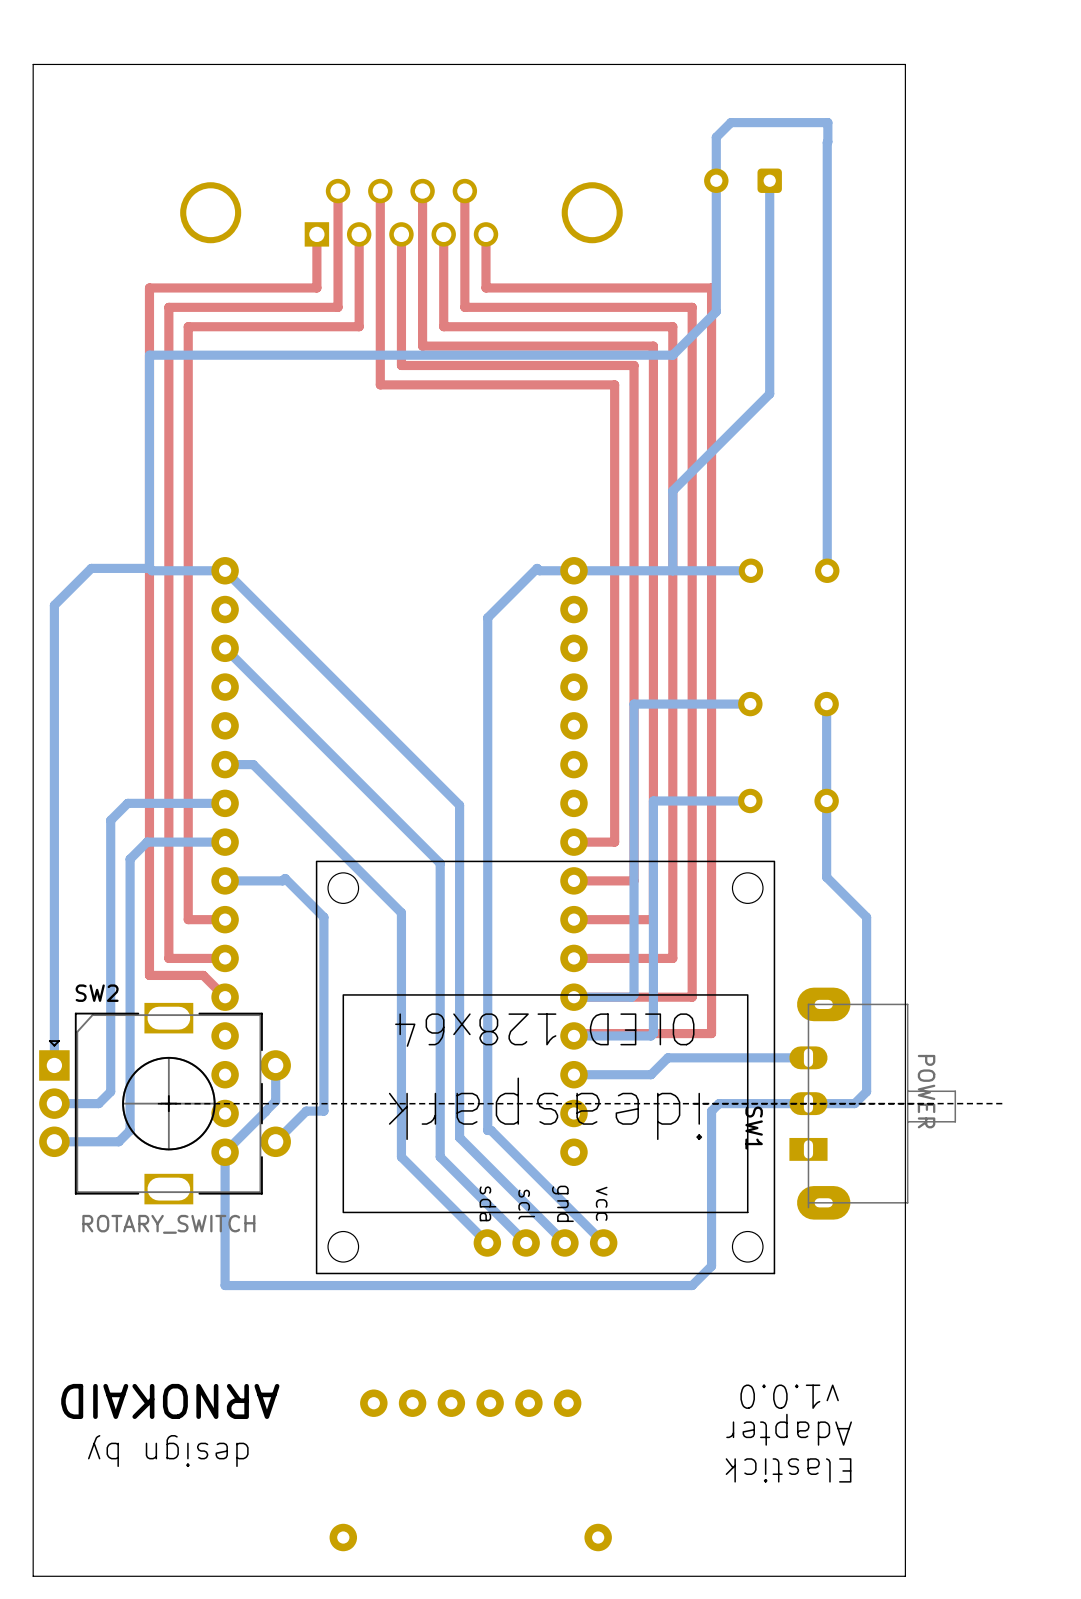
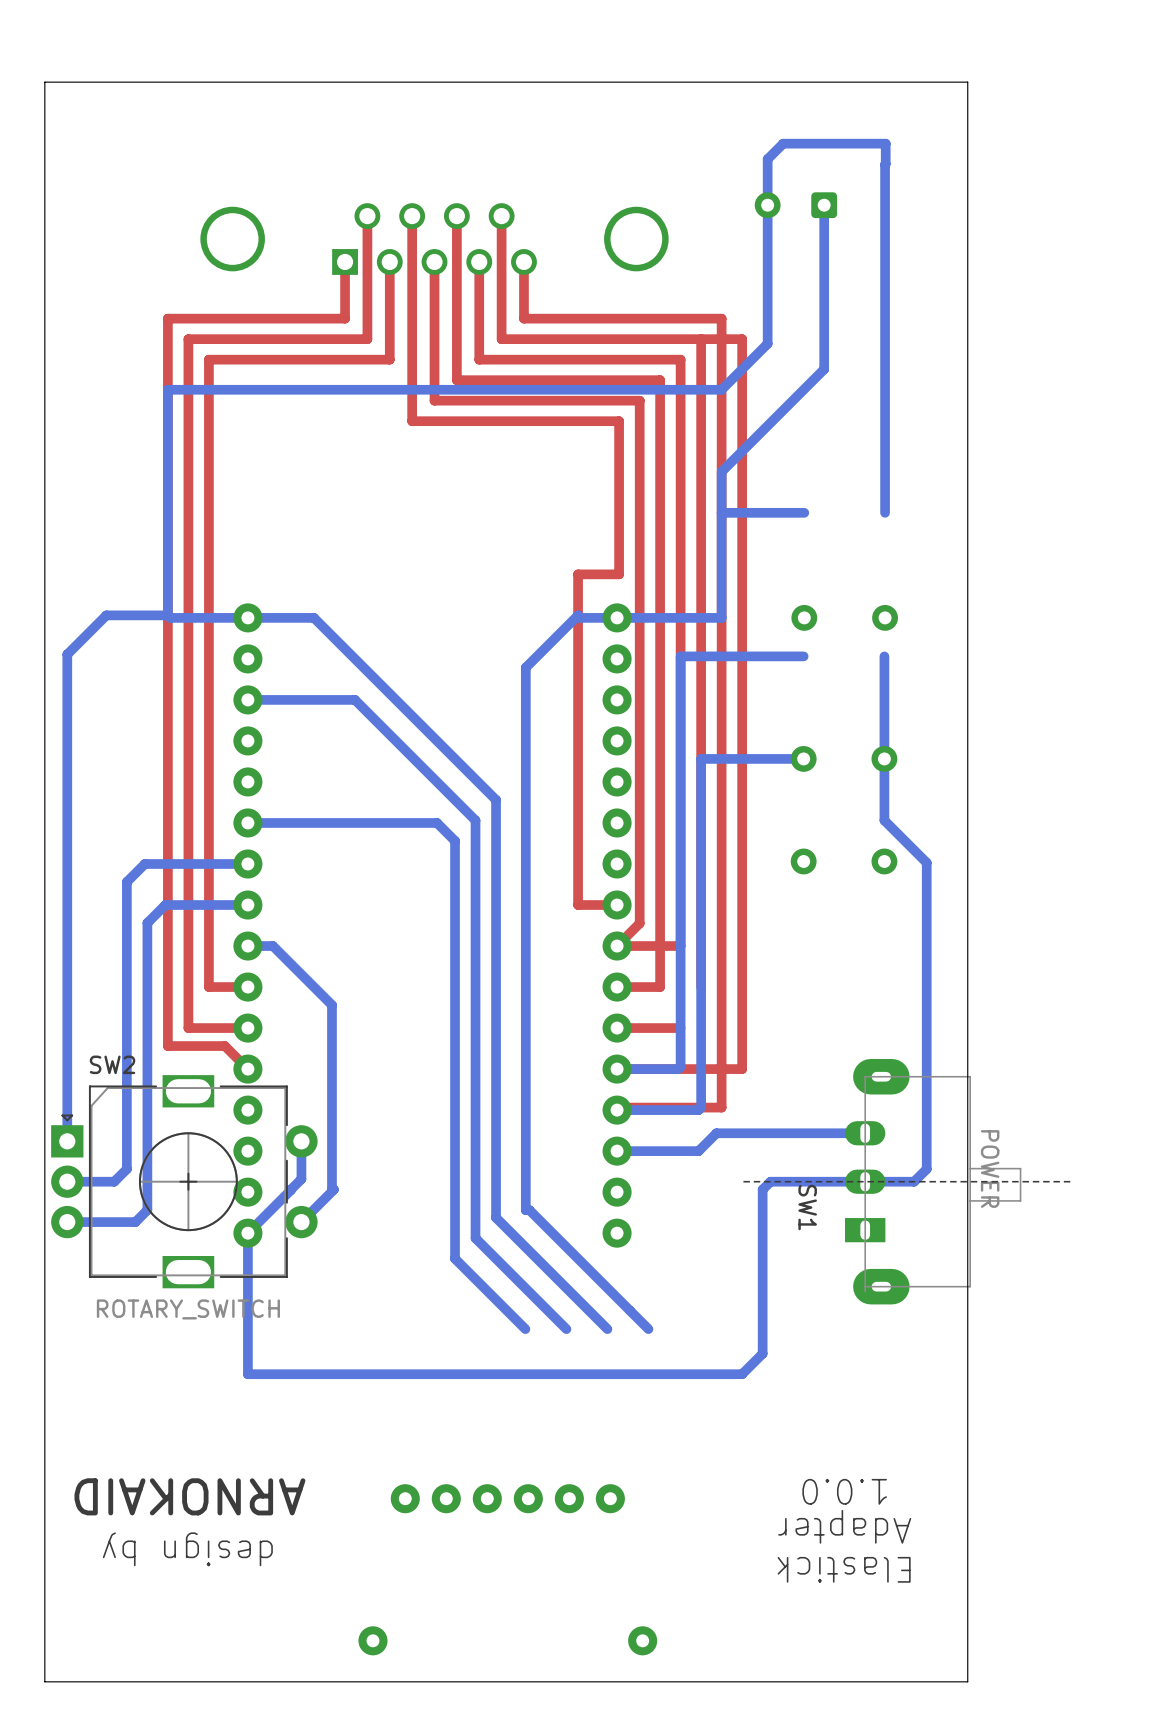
top track: (672, 287) (711, 287) (711, 1033) (672, 1033) -> none
top track: (672, 326) (634, 326) -> (721, 359) (721, 318)
bottom track: (769, 335) (769, 393) (672, 490) -> (824, 369) (721, 471) (721, 533)
top track: (653, 346) (614, 346) -> (701, 380) (701, 339)
top track: none -> (639, 400) (639, 923) (617, 946)
top track: (634, 365) (595, 365) -> (680, 400) (680, 359)
top track: (614, 384) (575, 384) -> (660, 421) (660, 380)
bottom track: (827, 471) (826, 571) -> none
bottom track: (225, 570) (459, 805) -> (247, 617) (313, 617) (496, 799) (496, 866)
bottom track: (750, 570) (672, 570) -> (804, 512) (721, 512)
bottom track: none -> (803, 656) (680, 656) (680, 758)
bottom track: none -> (884, 656) (884, 758)
bottom track: (225, 648) (440, 863) -> (247, 699) (354, 699) (475, 820) (475, 927)
bottom track: (653, 704) (634, 704) -> (701, 758) (701, 861)
bottom track: (826, 762) (826, 877) (866, 917) -> (884, 820) (926, 862) (926, 984)
bottom track: (253, 764) (401, 912) (401, 1157) (420, 1176) -> (277, 822) (437, 822) (455, 840) (455, 1258)
bottom track: (750, 800) (653, 800) -> none
top track: (614, 842) (573, 842) -> (619, 421) (619, 574) (578, 574) (578, 905) (617, 905)
bottom track: (248, 880) (282, 880) (285, 878) (323, 917) (323, 1111) (306, 1111) -> (272, 946) (331, 1005) (331, 1189) (333, 1189)
top track: (653, 919) (614, 919) -> (660, 905) (660, 987)
top track: (672, 958) (634, 958) -> (721, 1028) (721, 1107)
part: (545, 1067) -> none
text: v1.0.0 (789, 1396) -> 1.0.0 (844, 1491)

